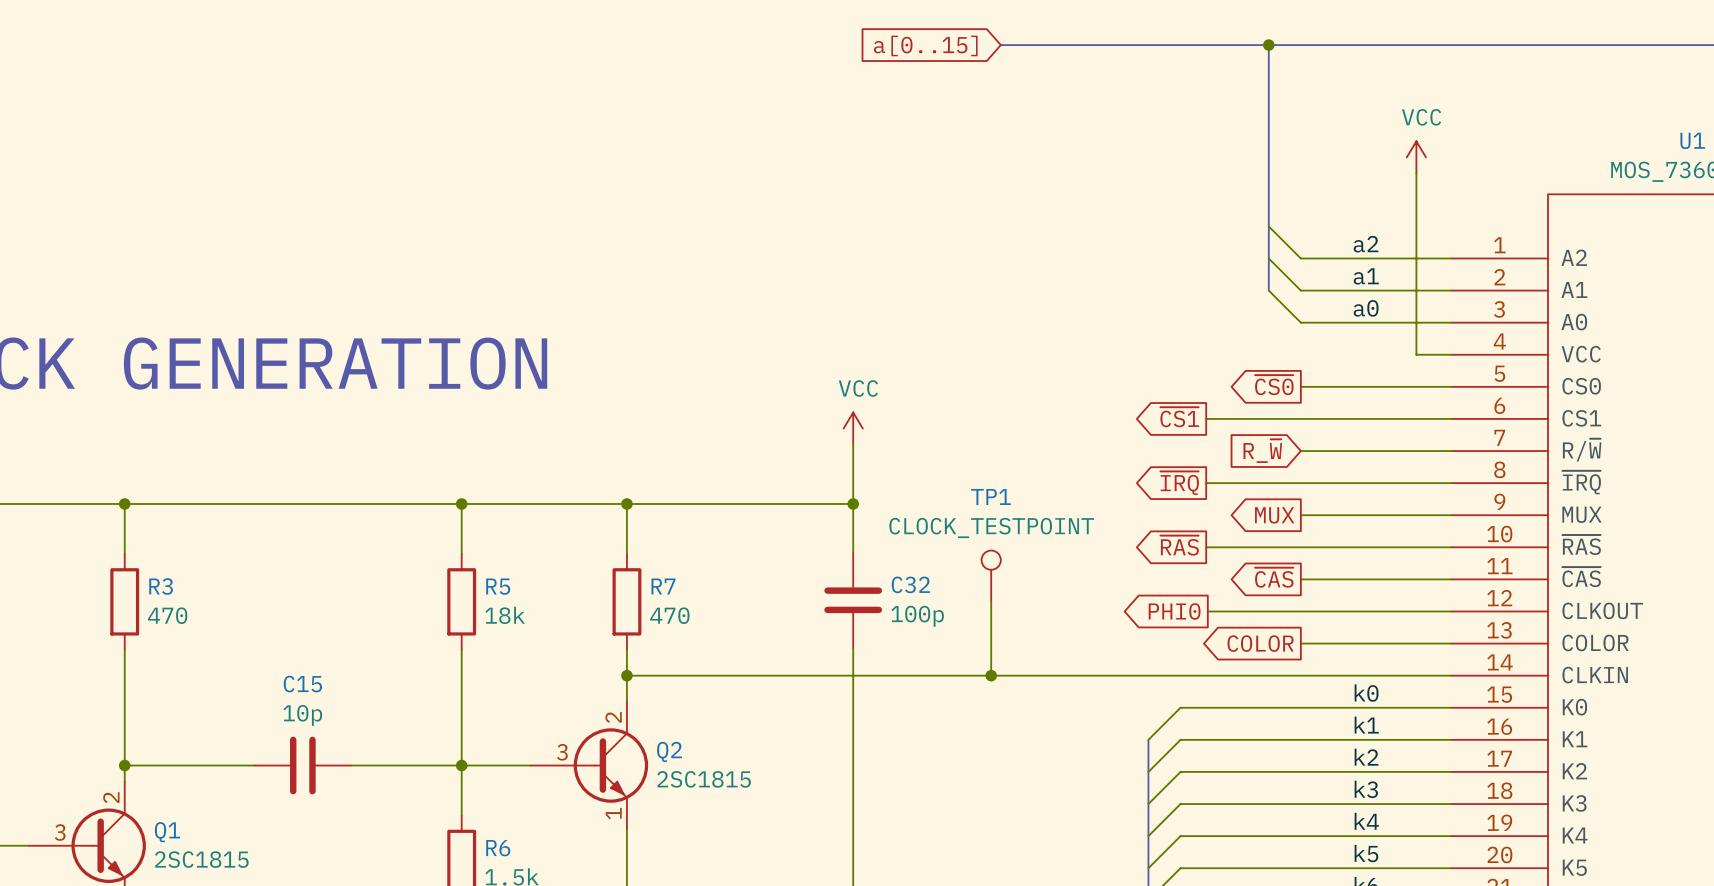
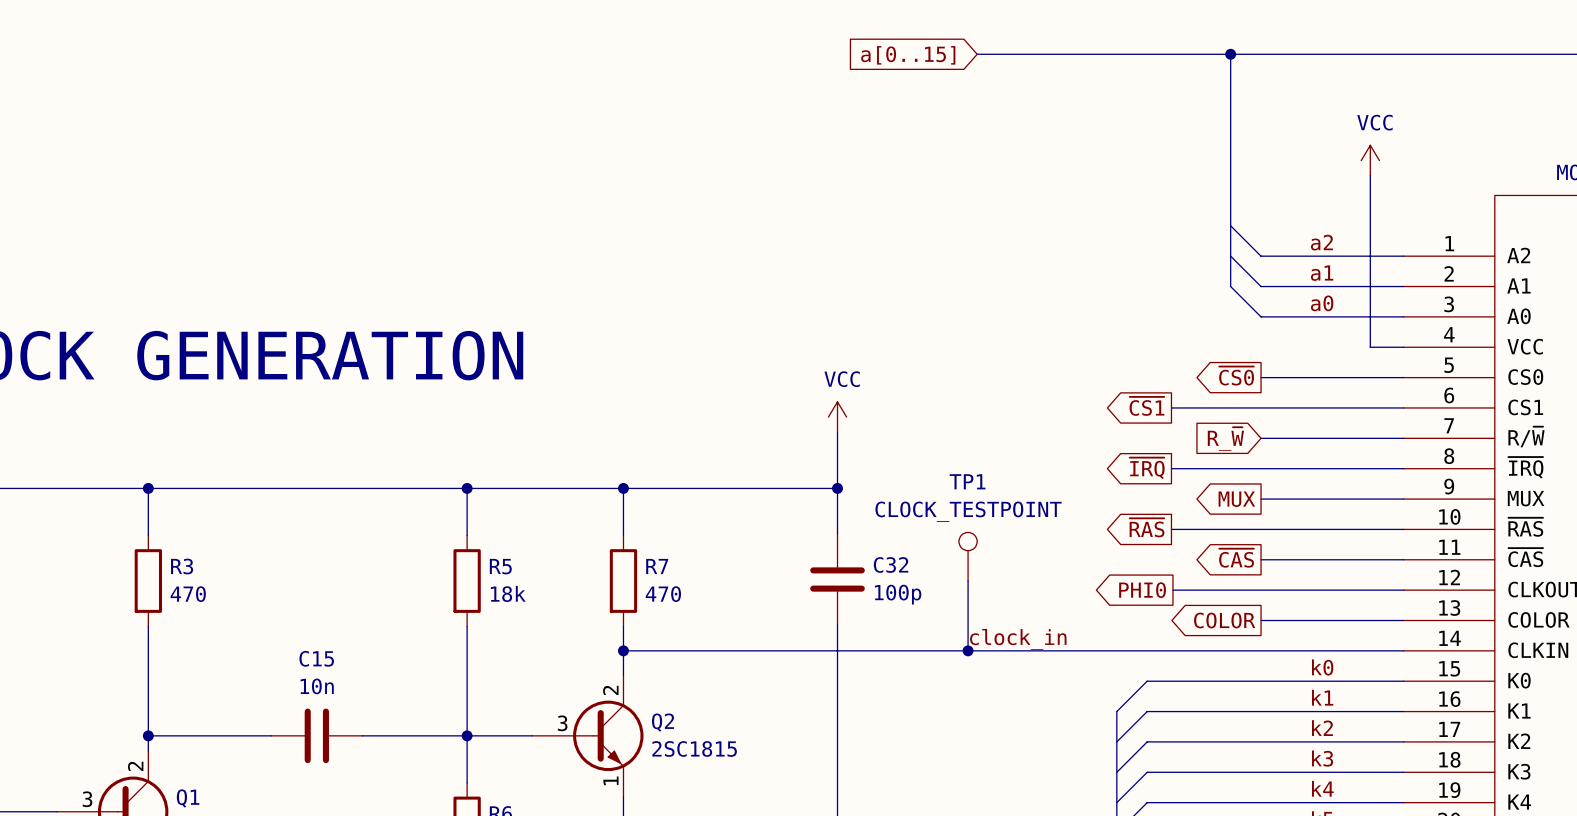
label: none -> clock_in (1018, 639)
C15 value: 10p (302, 715) -> 10n (317, 686)

